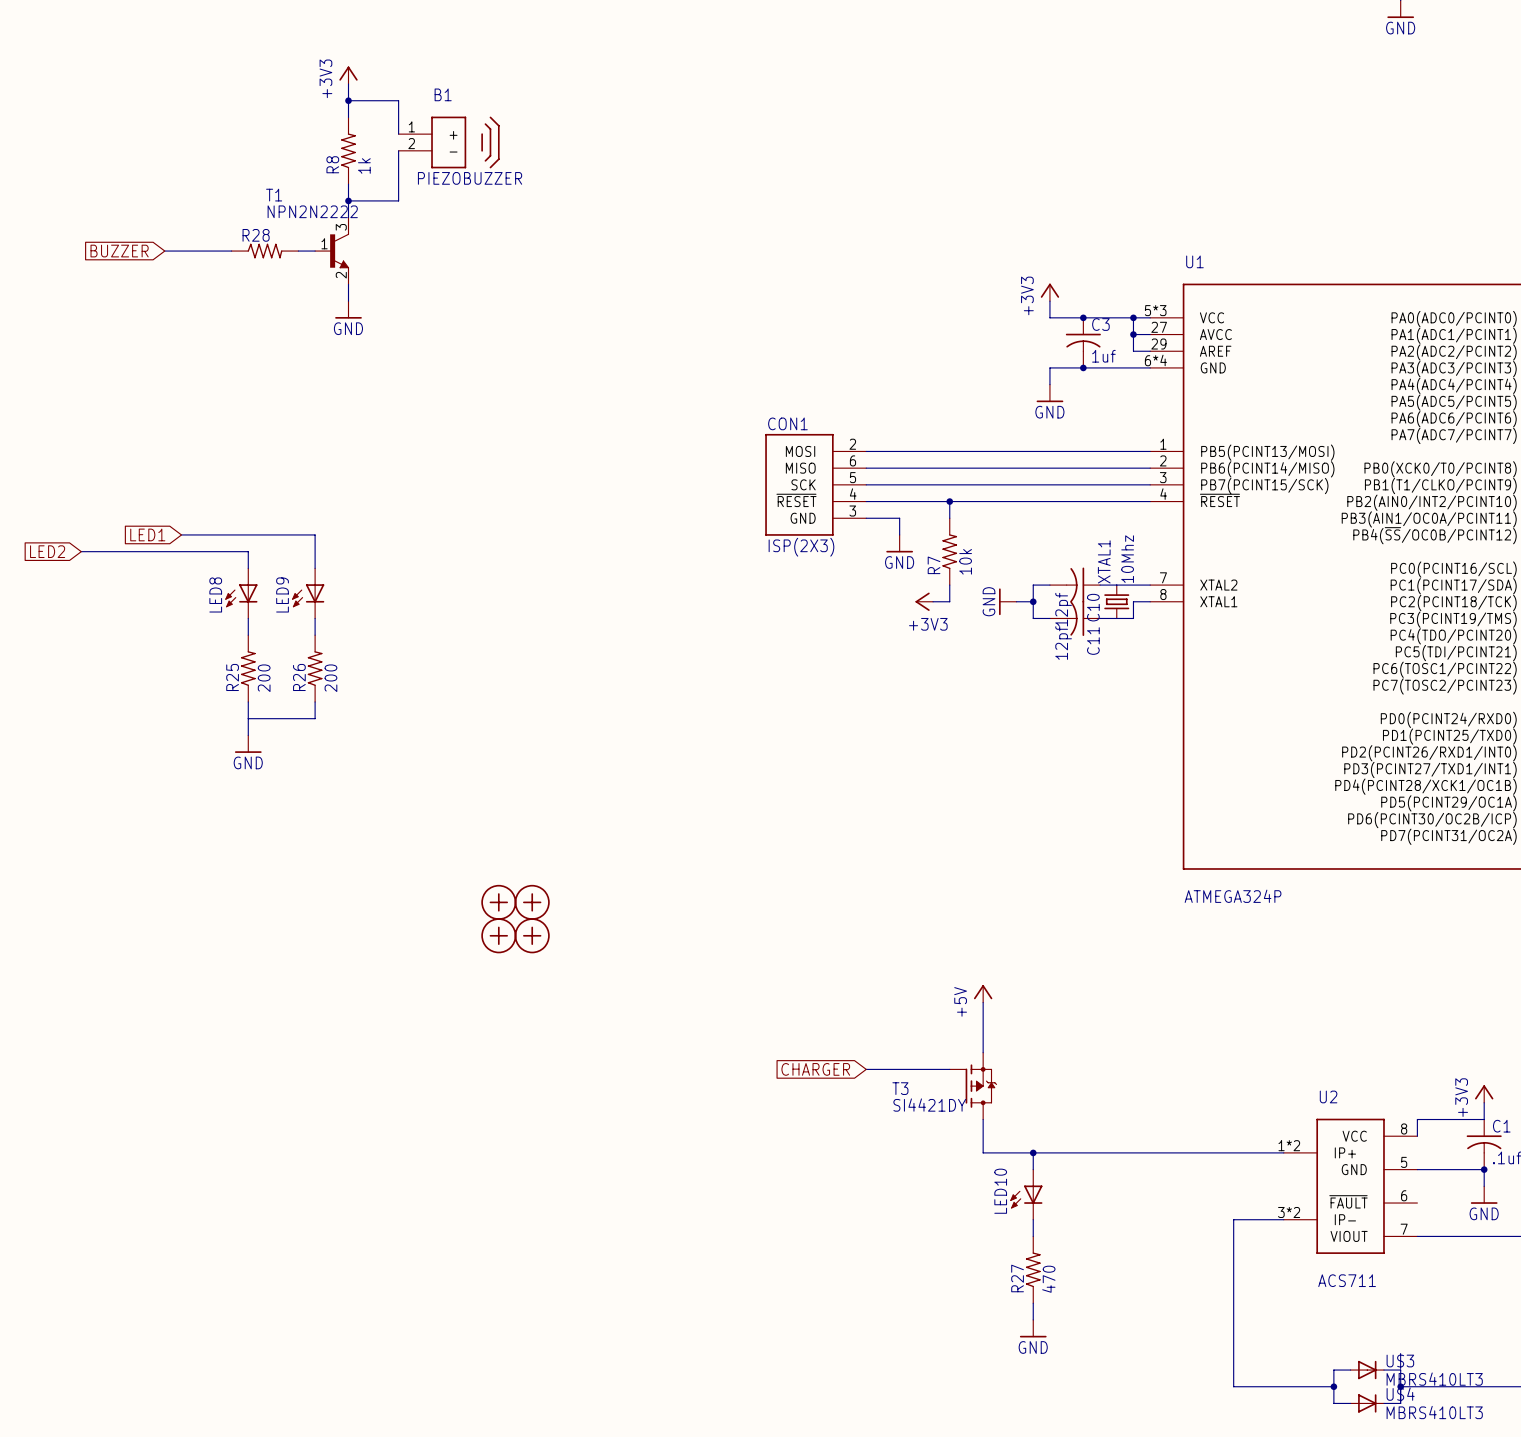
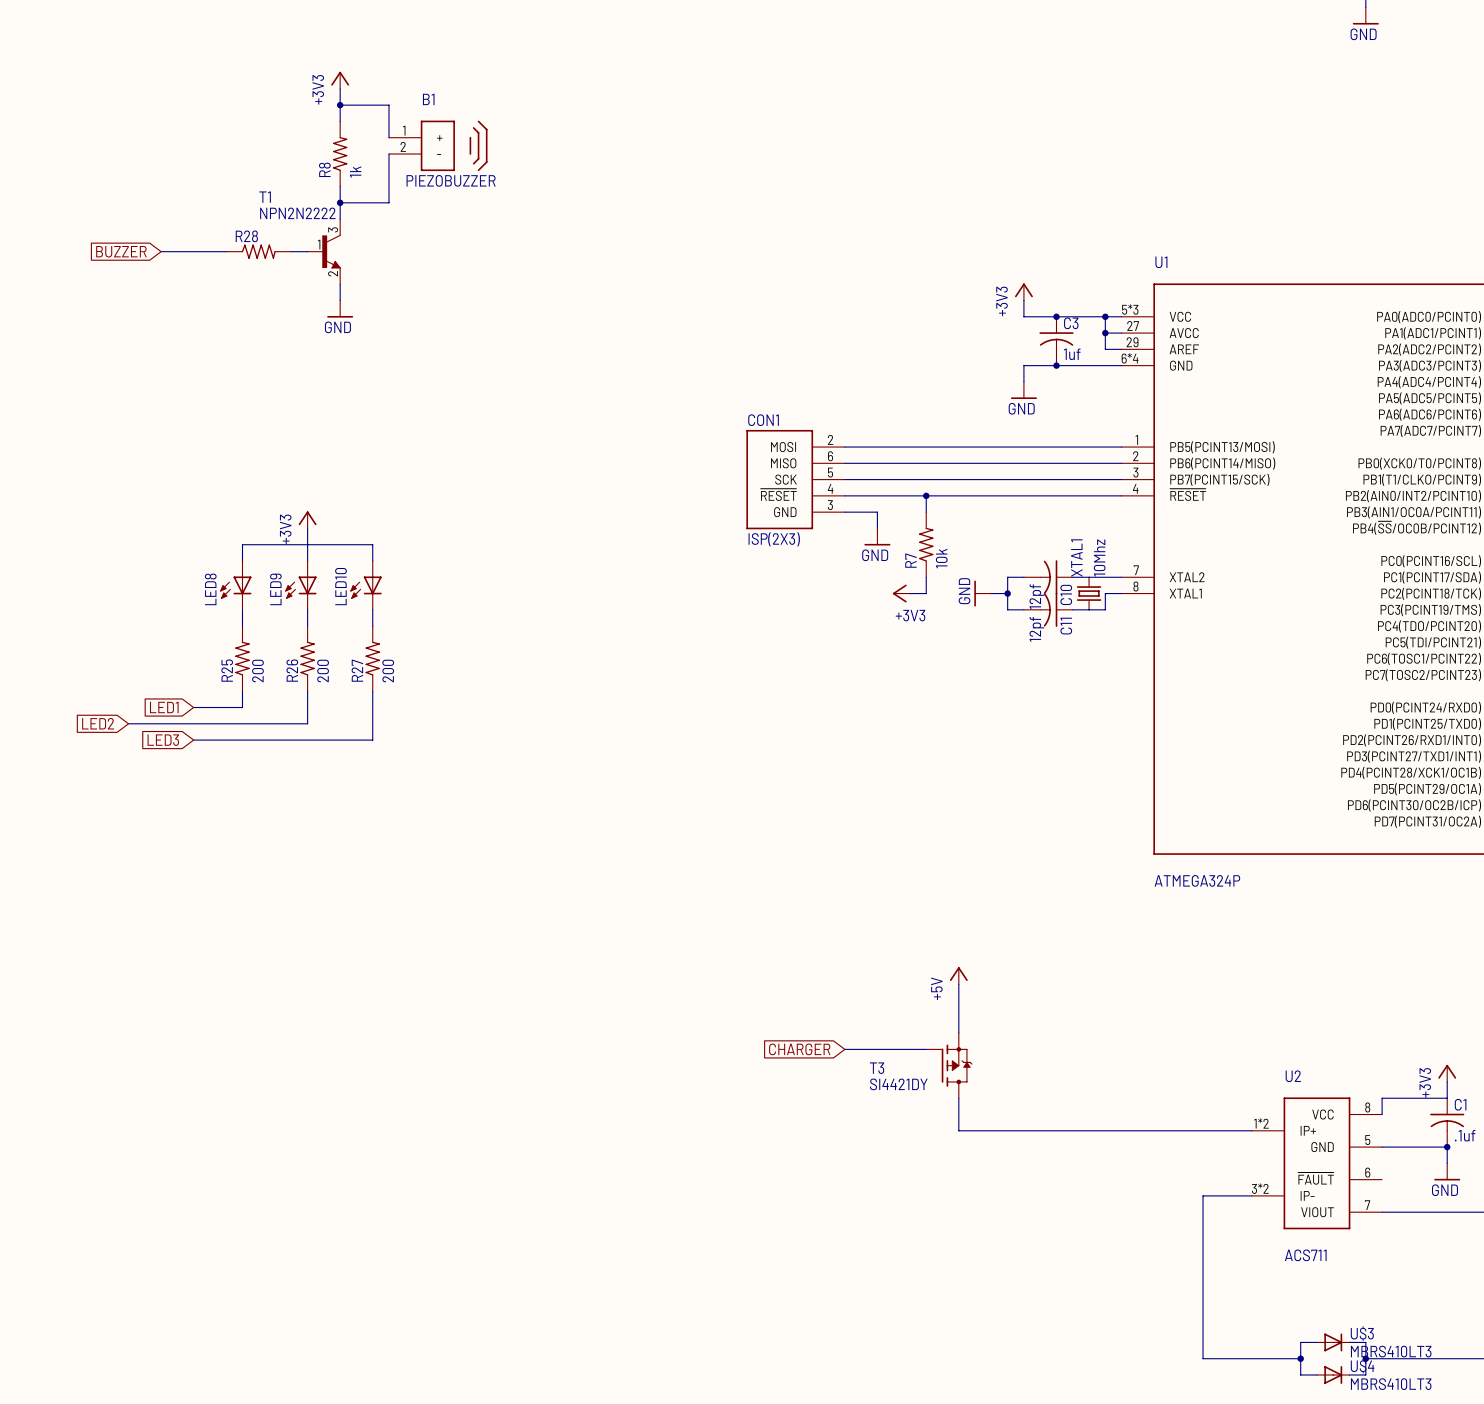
power symbol: none -> +3V3 (307, 519)
global label: LED1 (147, 534) -> none
wire: (181, 534) (315, 534) -> none
global label: LED2 (47, 551) -> none
wire: (81, 551) (248, 551) -> (372, 560) (372, 544) (242, 544)
wire: none -> (372, 609) (372, 626)
wire: none -> (372, 691) (372, 740) (193, 740)
global label: none -> LED1 (164, 707)
wire: none -> (193, 707) (242, 707)
wire: (315, 718) (248, 718) (248, 735) -> (307, 707) (307, 723) (128, 723)
global label: none -> LED2 (98, 723)
power symbol: GND (248, 744) -> none
global label: none -> LED3 (163, 740)
part: (498, 902) -> none
part: (532, 902) -> none
part: (498, 935) -> none
part: (532, 935) -> none
wire: (1033, 1152) (1033, 1169) -> none
junction: (1033, 1152) -> none
LED10 position: (1026, 1194) -> (365, 585)
wire: (1033, 1219) (1033, 1236) -> none
R27 position: (1033, 1269) -> (372, 658)
R27 value: 470 (1048, 1279) -> 200 (388, 670)
wire: (1033, 1303) (1033, 1319) -> none
power symbol: GND (1033, 1328) -> none

